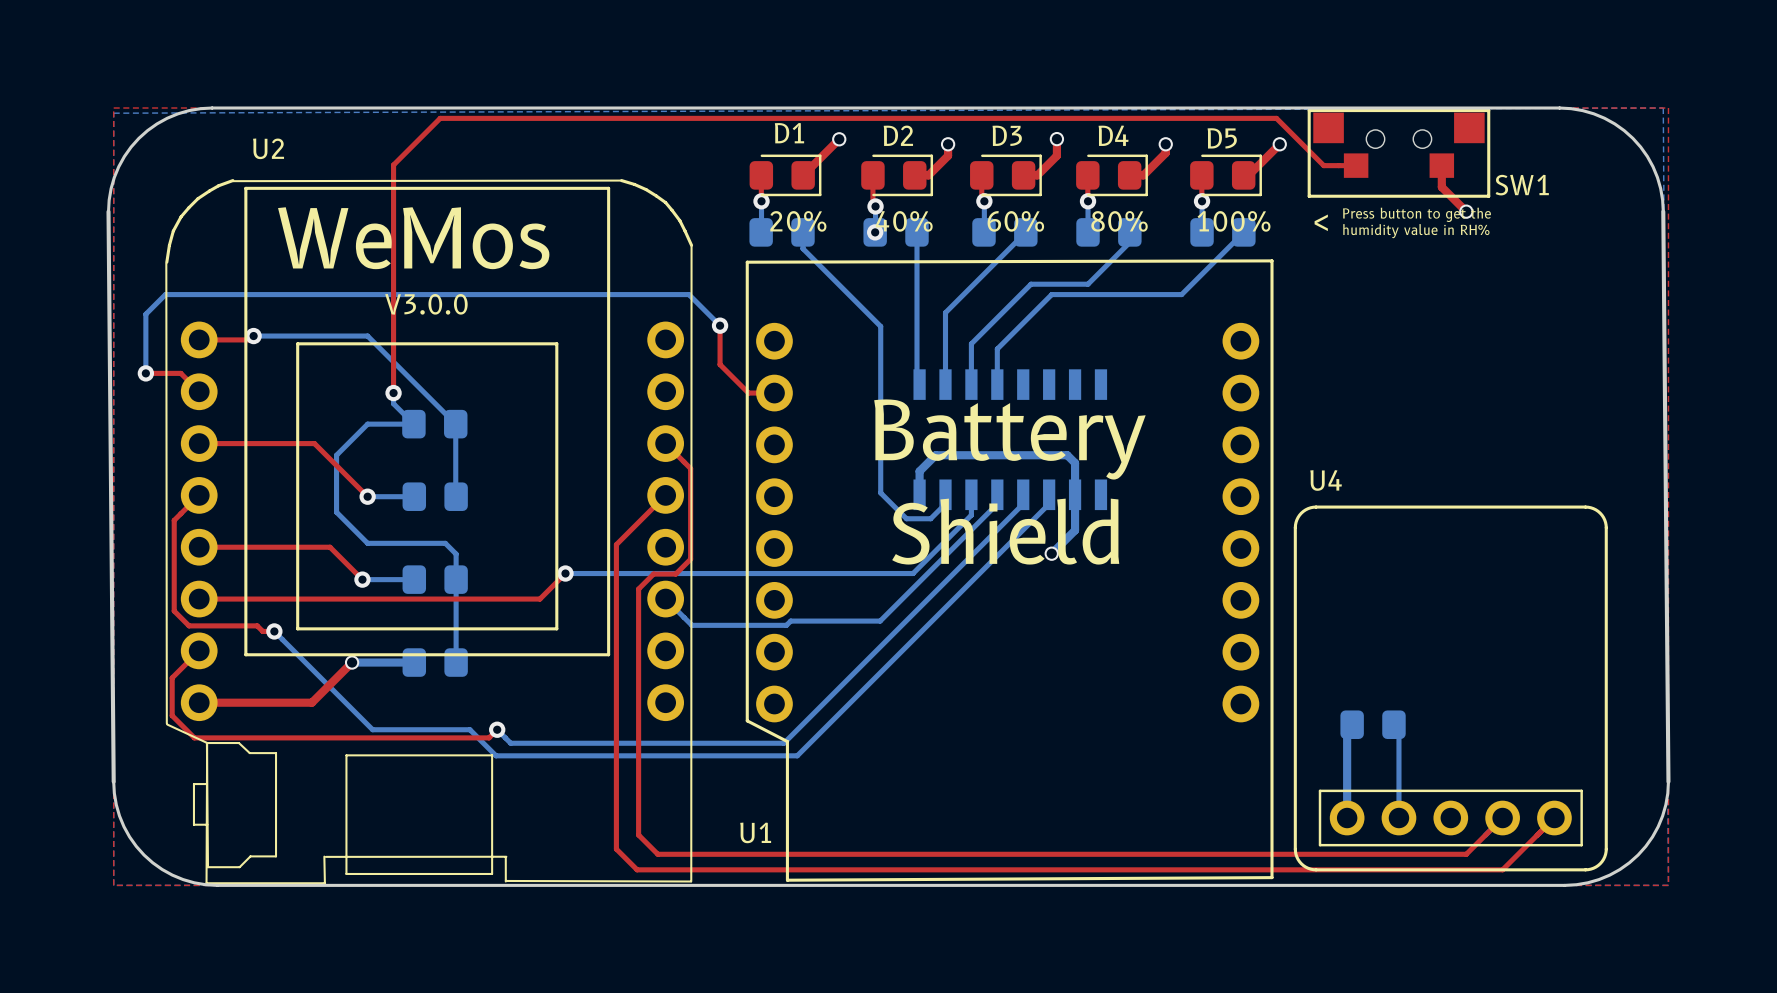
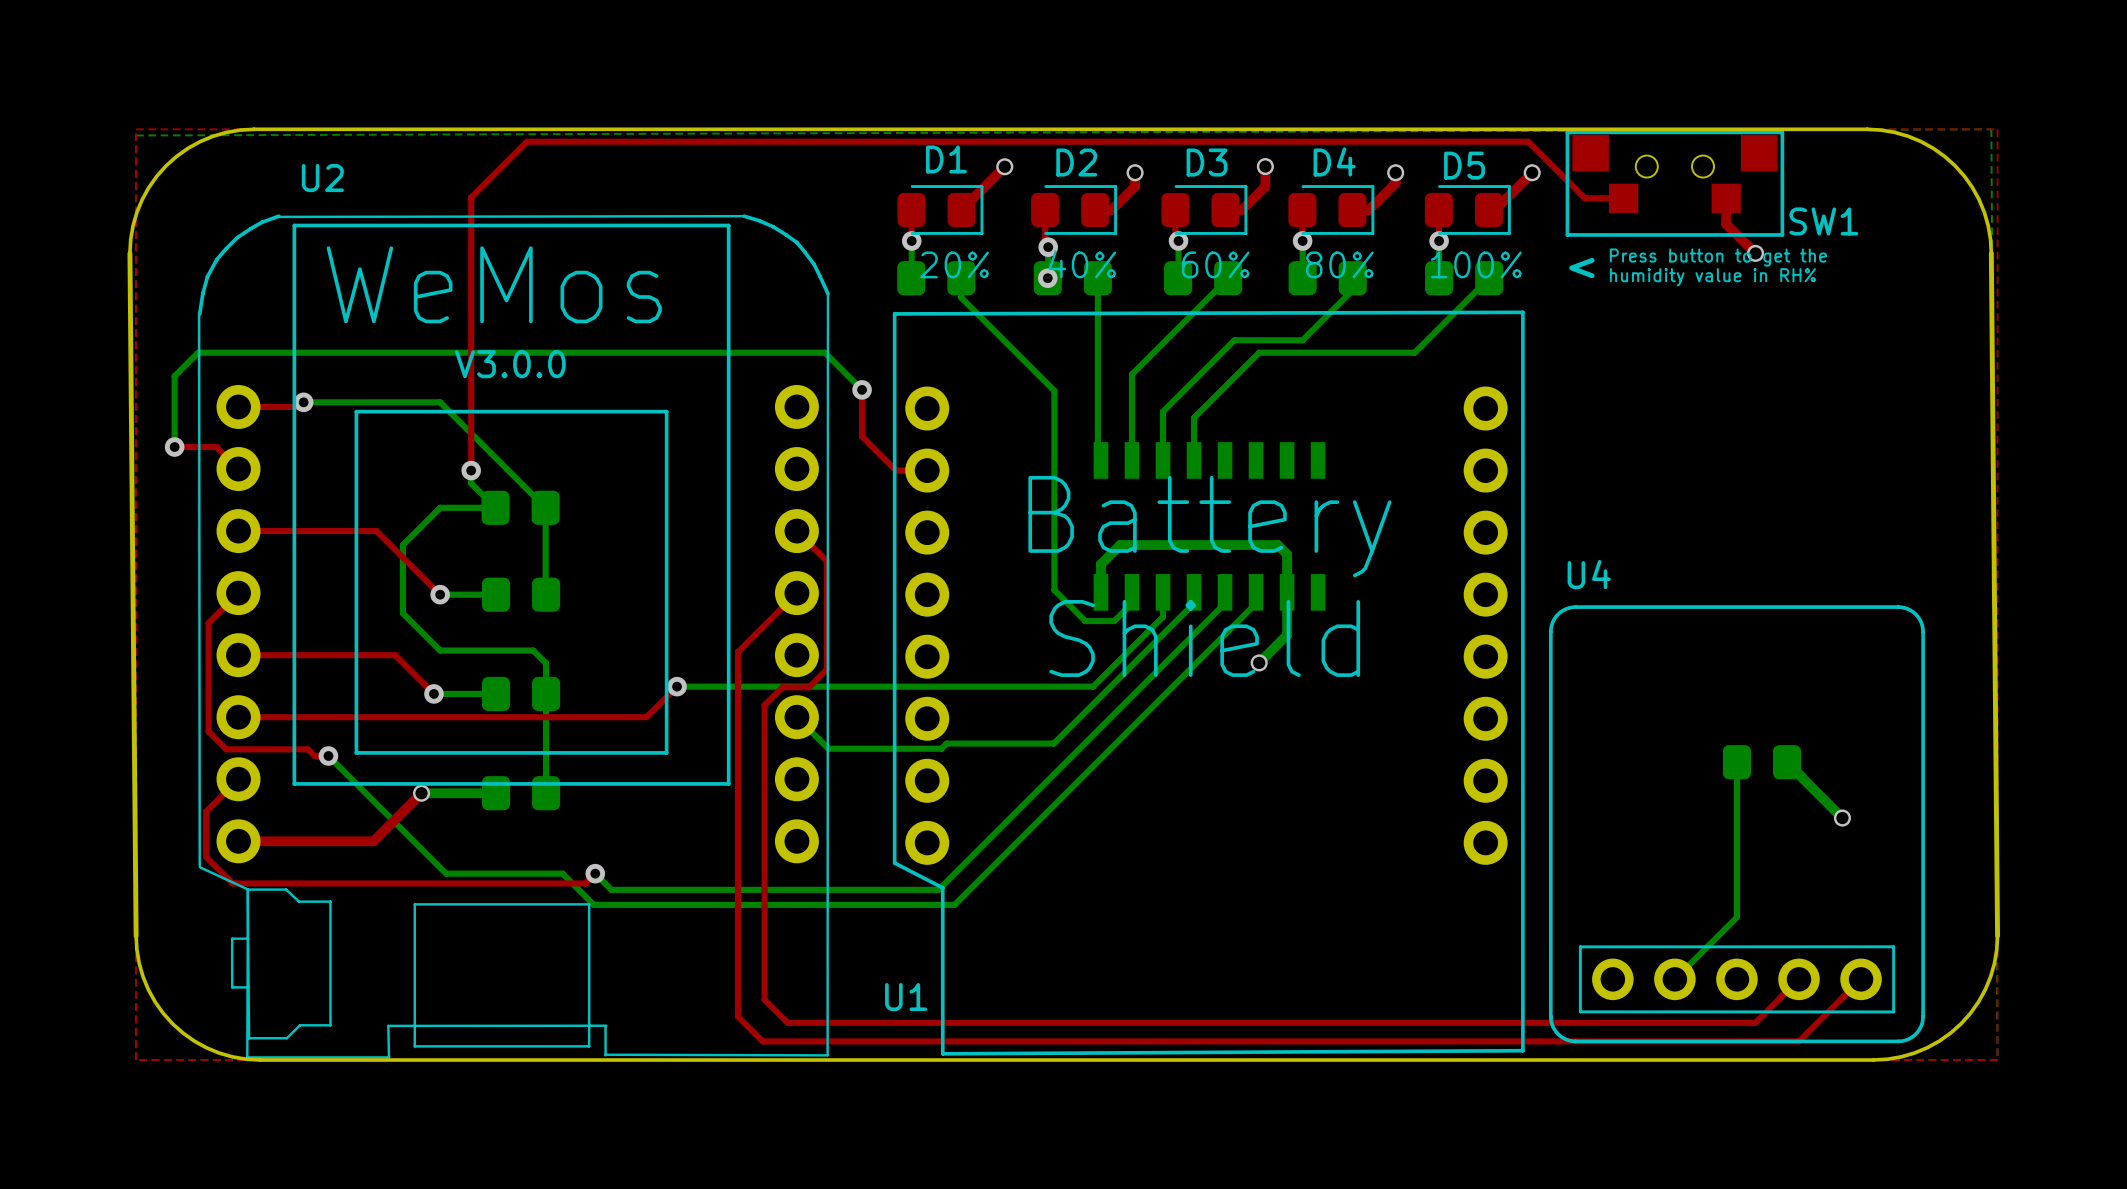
bottom track: none -> (1787, 762) (1842, 818)
via: none -> (1842, 818)
bottom track: (1352, 724) (1347, 729) (1347, 818) -> none
part position: (1373, 724) -> (1761, 762)
bottom track: (1393, 724) (1398, 729) (1398, 818) -> (1736, 762) (1736, 917) (1674, 979)

